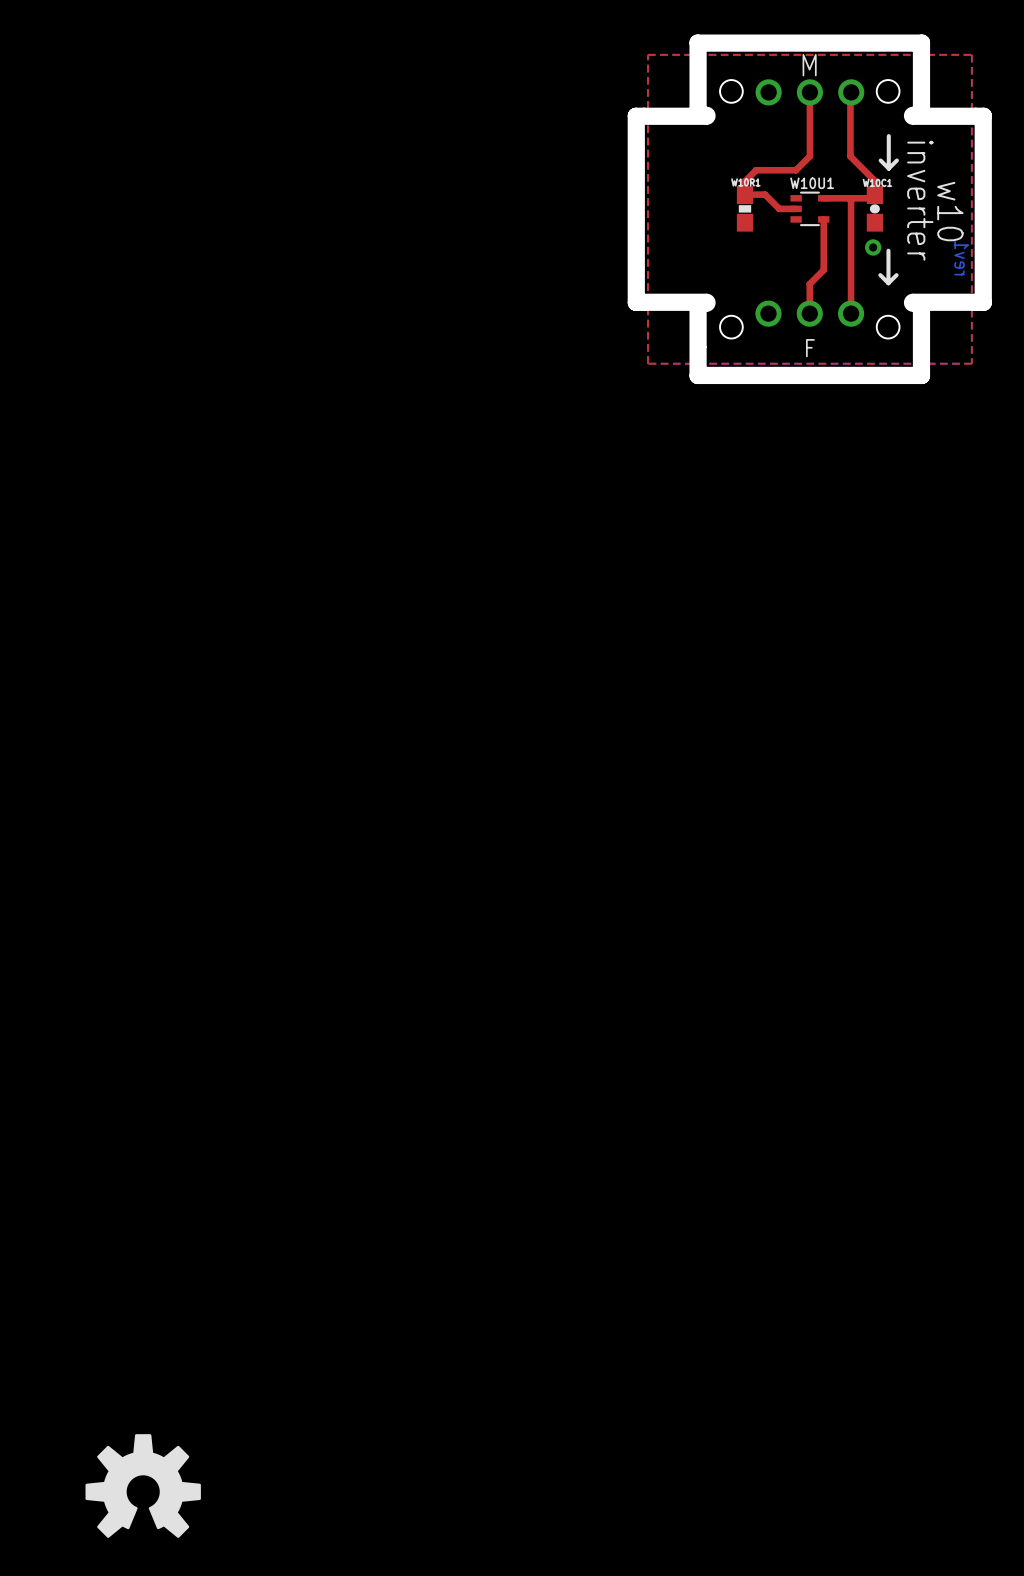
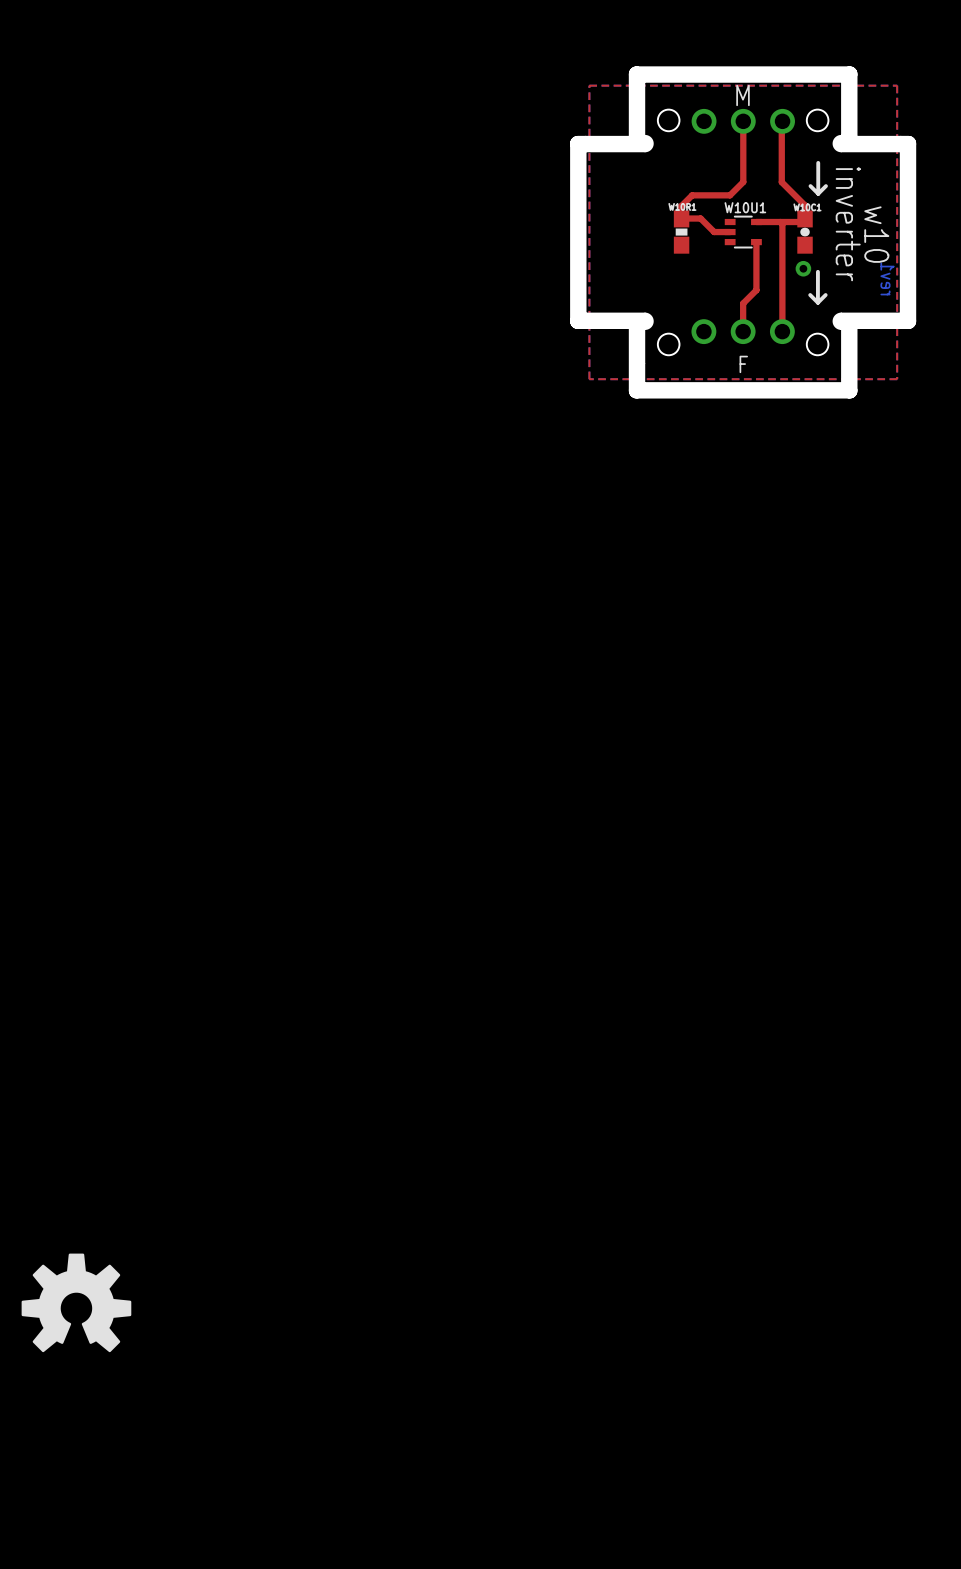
drawing position: (143, 1486) -> (76, 1302)

